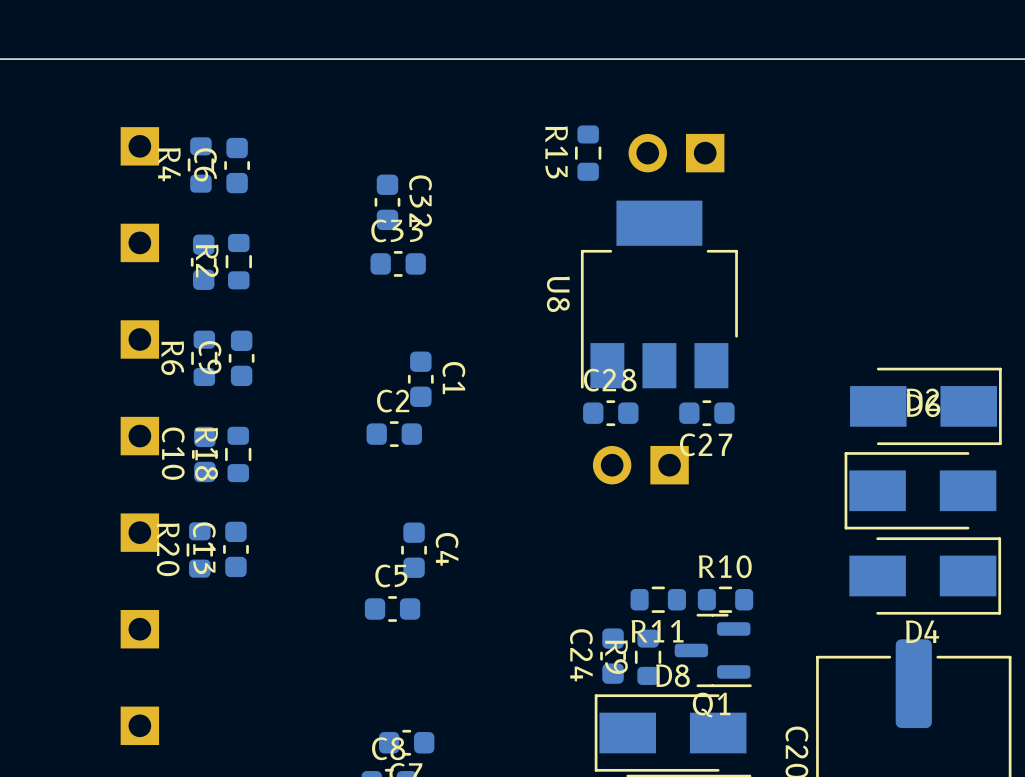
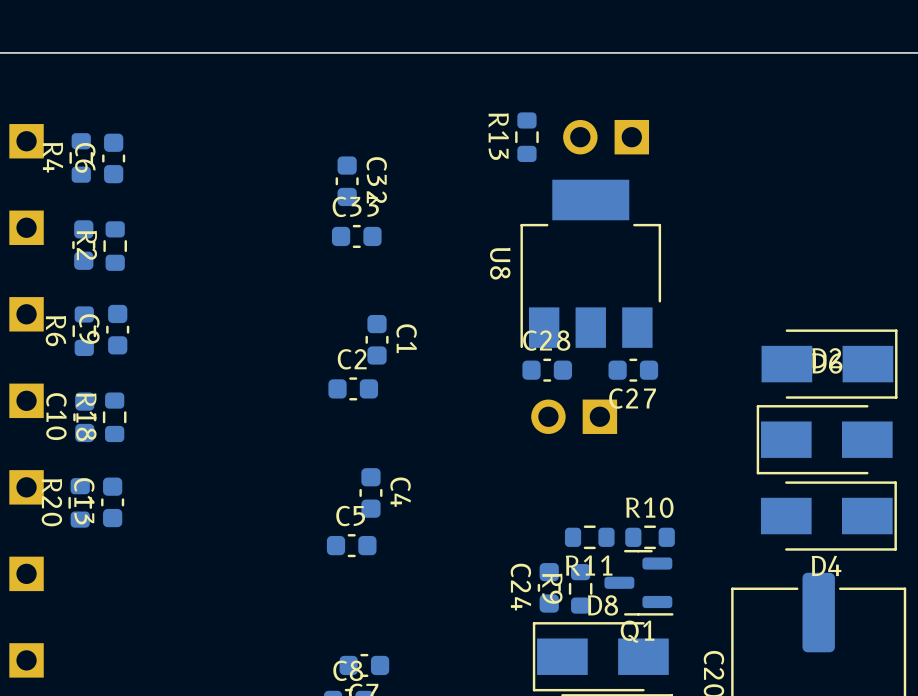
part: (139, 146) -> none
part: none -> (26, 141)
R4 position: (200, 164) -> (81, 157)
C6 position: (237, 165) -> (113, 158)
part: (139, 242) -> none
part: none -> (26, 227)
R2 position: (238, 261) -> (115, 246)
part position: (203, 262) -> (83, 245)
part: (139, 339) -> none
part: none -> (26, 314)
R6 position: (204, 358) -> (84, 331)
C9 position: (241, 358) -> (117, 329)
part: (139, 436) -> none
part: none -> (26, 400)
C10 position: (204, 454) -> (84, 417)
R18 position: (238, 454) -> (114, 417)
part: (139, 532) -> none
part: none -> (26, 487)
R20 position: (199, 549) -> (80, 502)
C13 position: (235, 549) -> (112, 502)
part: (139, 629) -> none
part: none -> (26, 573)
part: (139, 725) -> none
part: none -> (26, 660)

